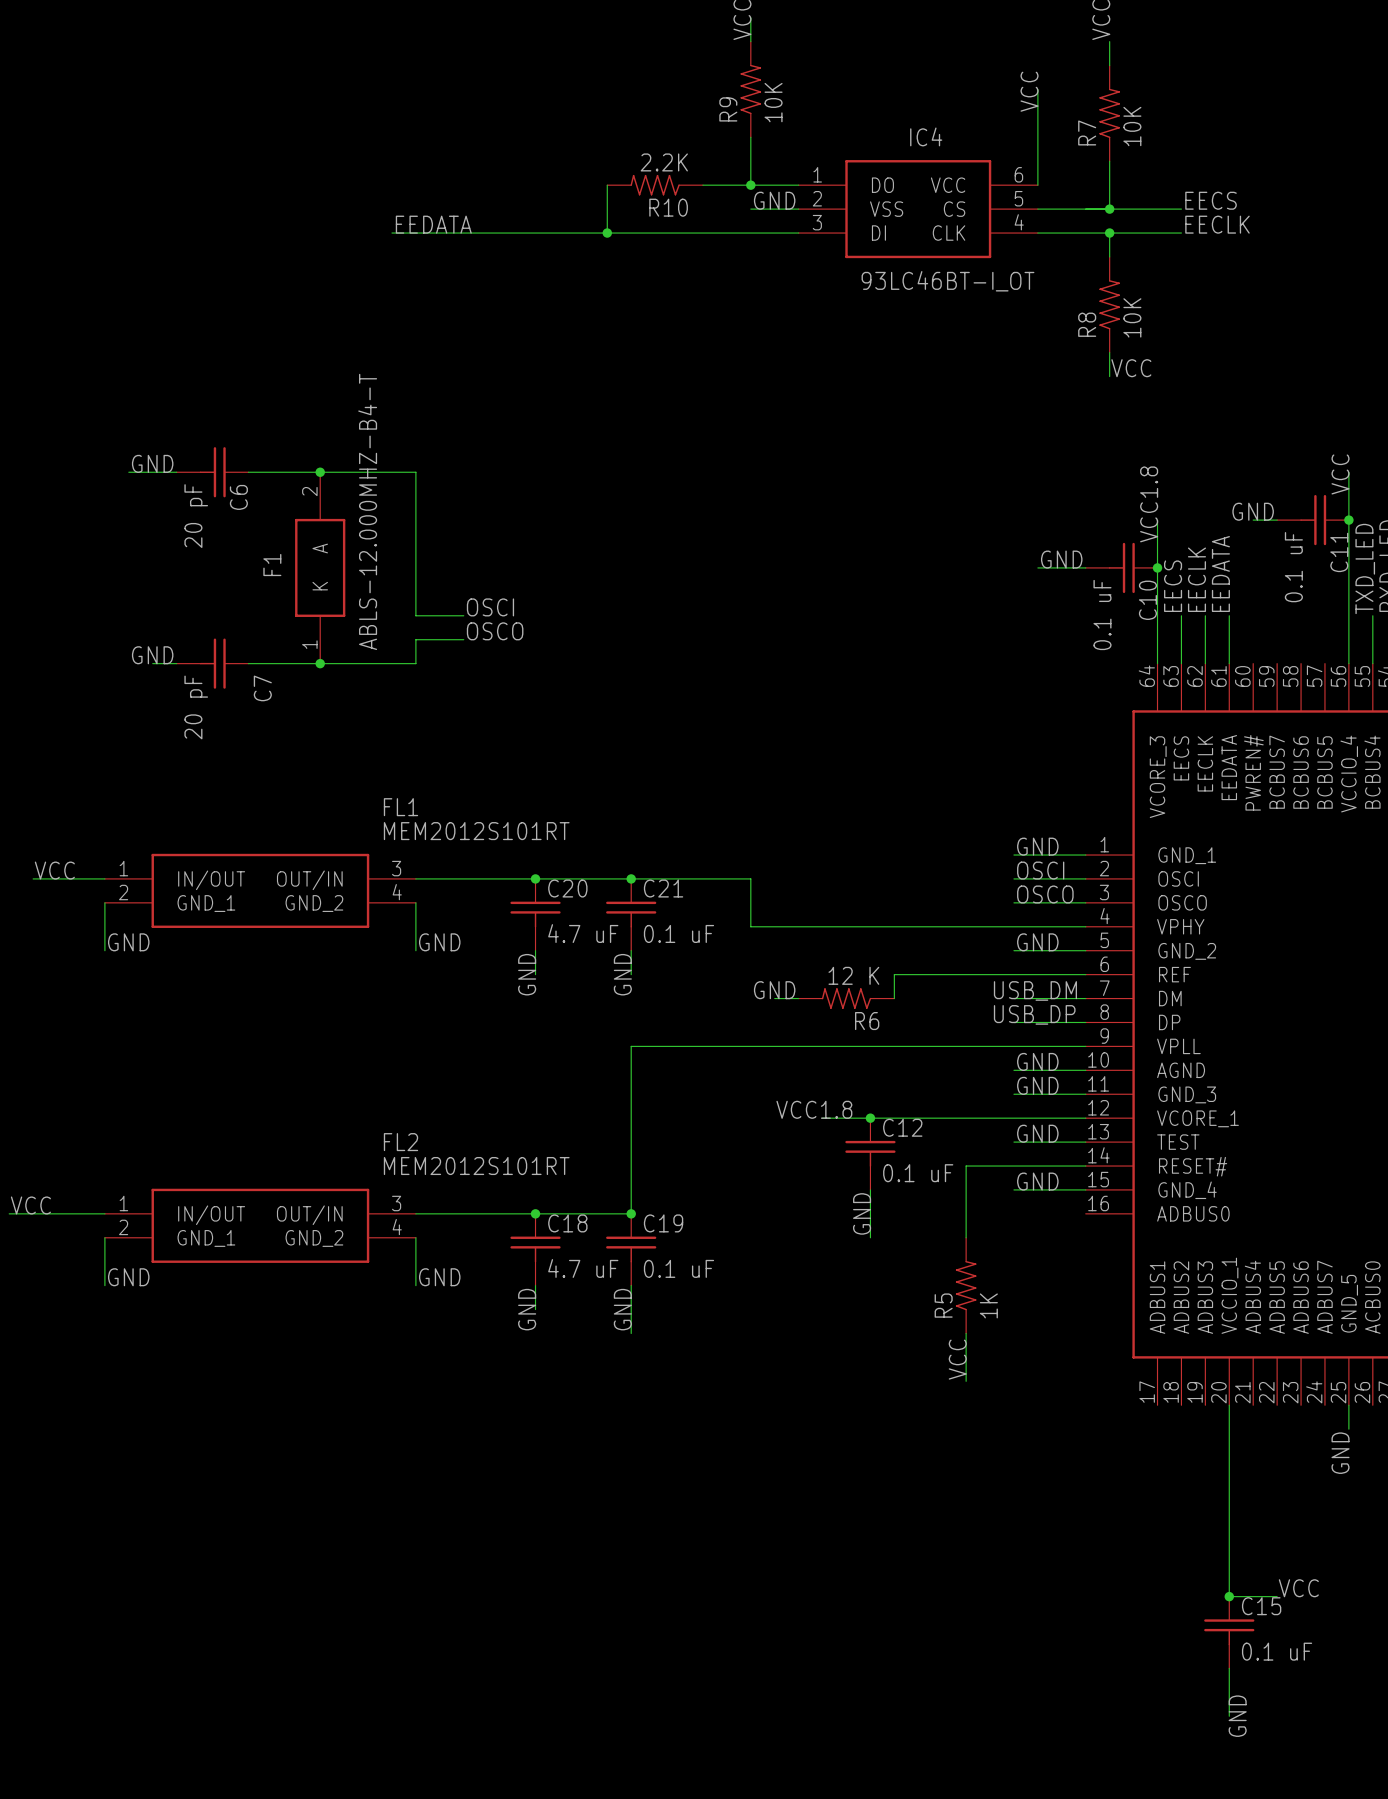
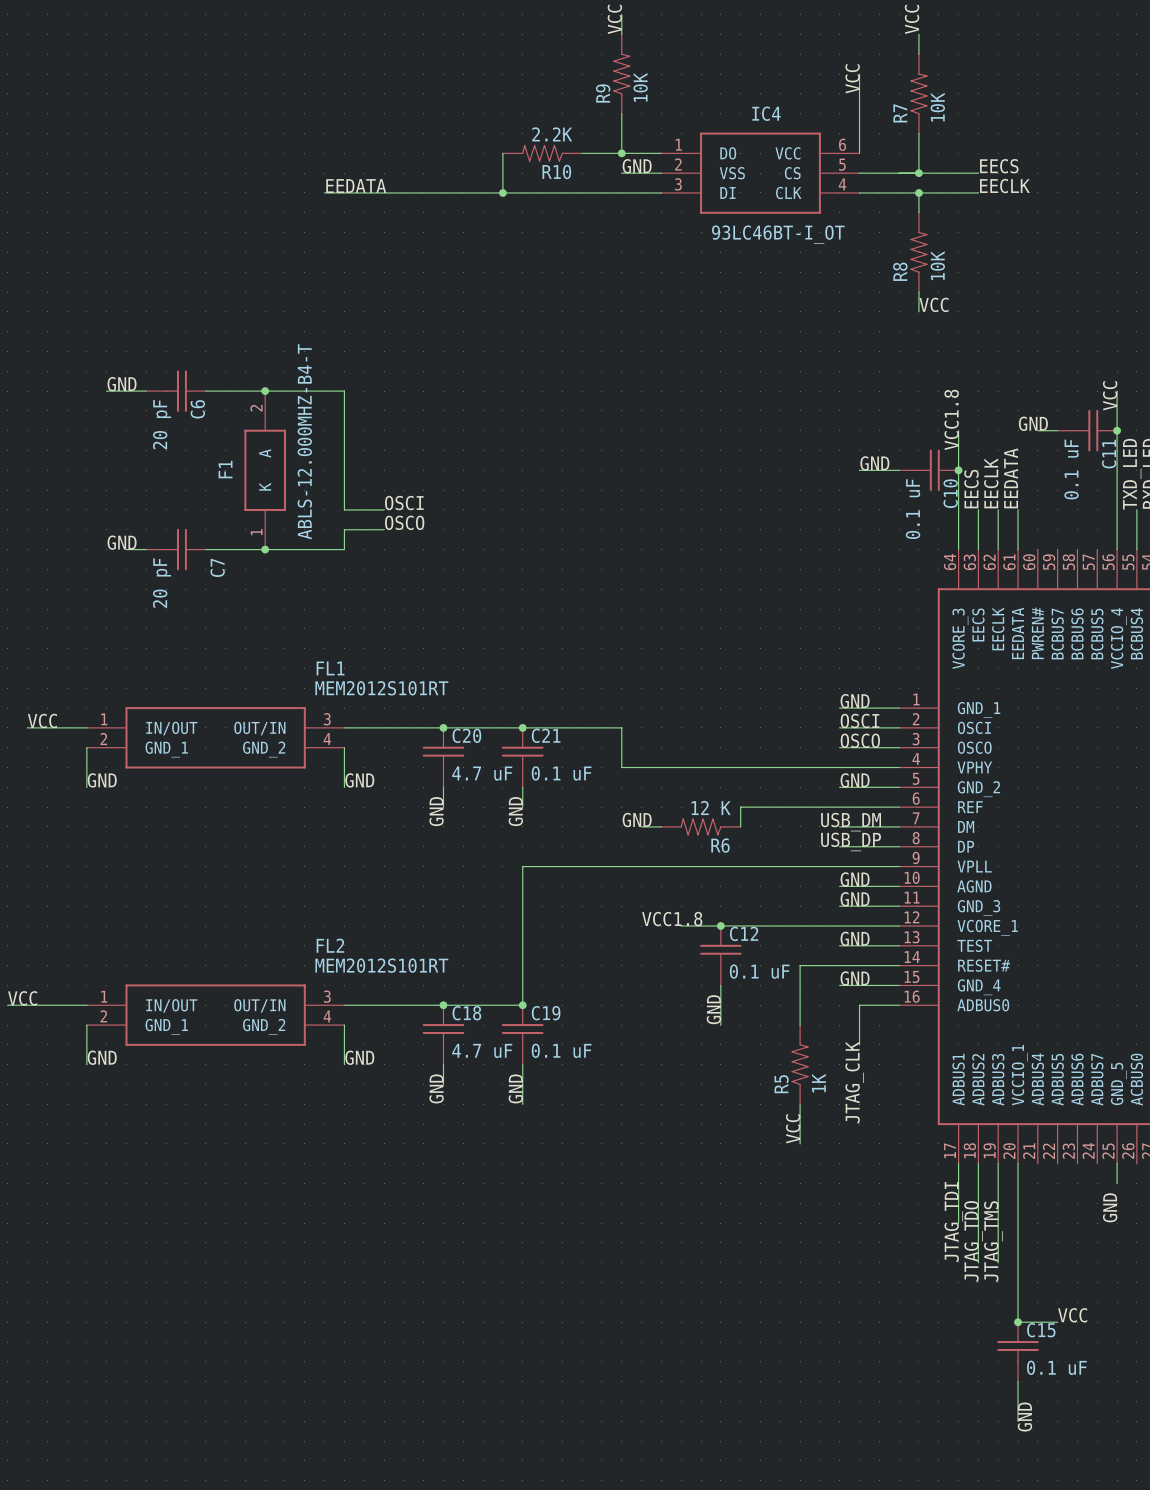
wire: none -> (899, 1005) (859, 1005) (859, 1044)
label: none -> JTAG_CLK (854, 1082)
wire: none -> (958, 1163) (958, 1223)
wire: none -> (978, 1163) (978, 1262)
wire: none -> (998, 1163) (998, 1262)
label: none -> JTAG_TDI (953, 1221)
label: none -> JTAG_TDO (973, 1241)
label: none -> JTAG_TMS (993, 1241)

